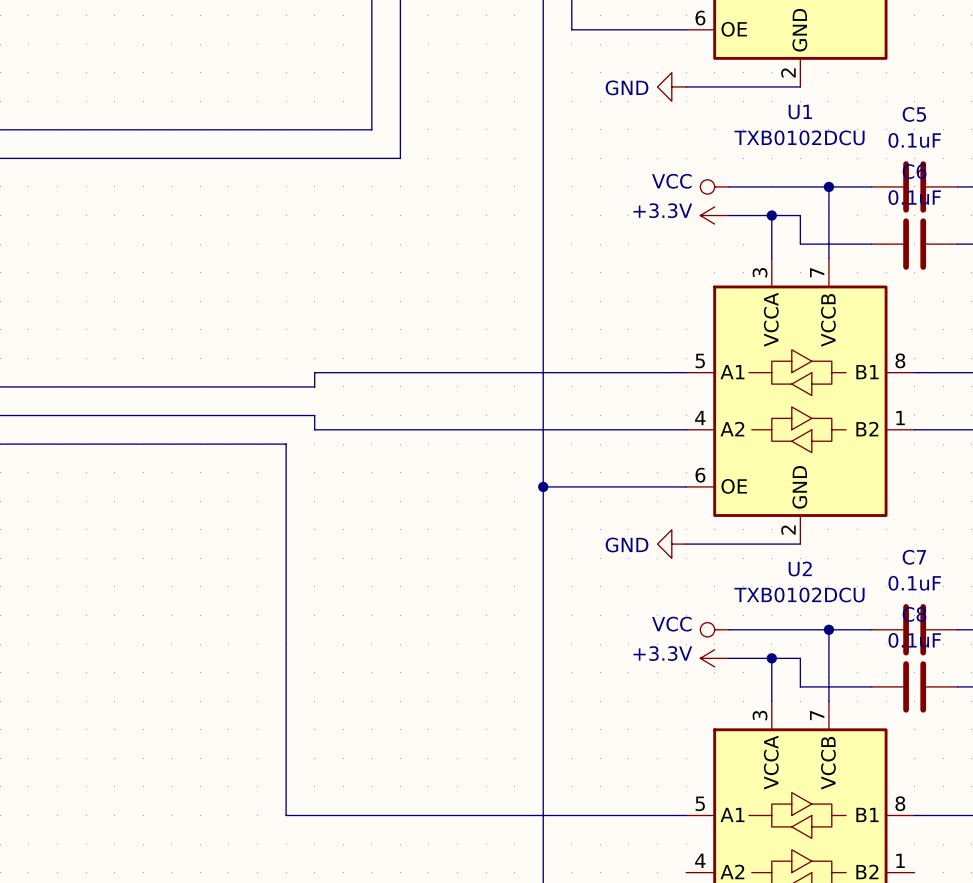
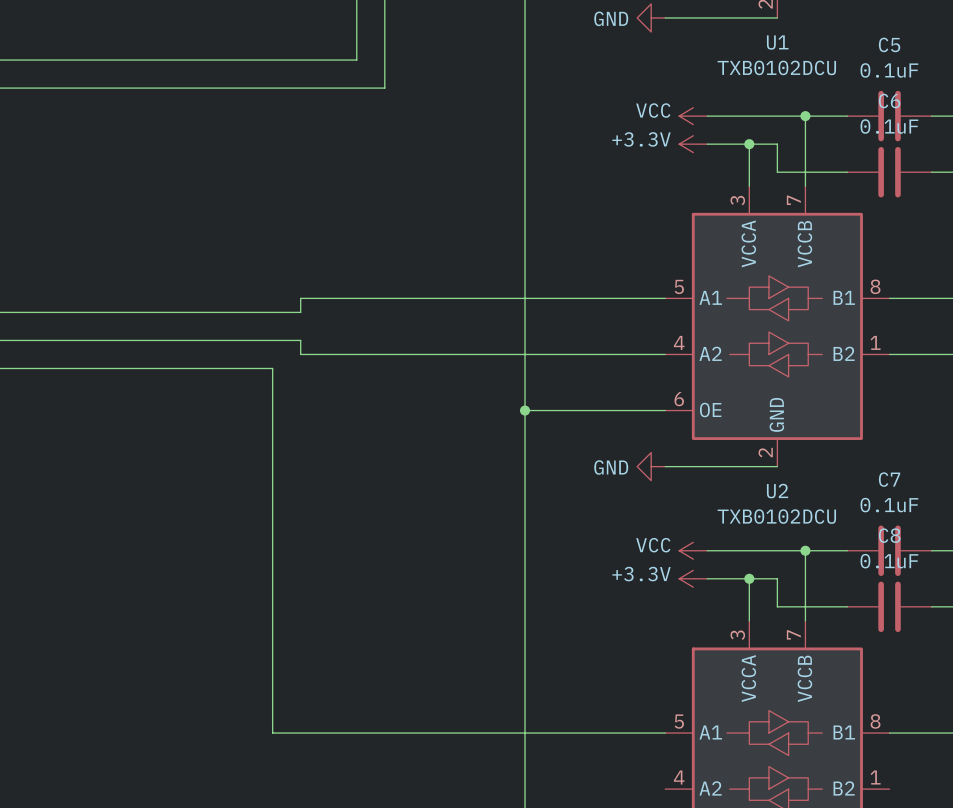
power symbol shape: [700, 179, 729, 195] -> [679, 107, 708, 125]
power symbol shape: [700, 622, 729, 637] -> [679, 542, 708, 560]

